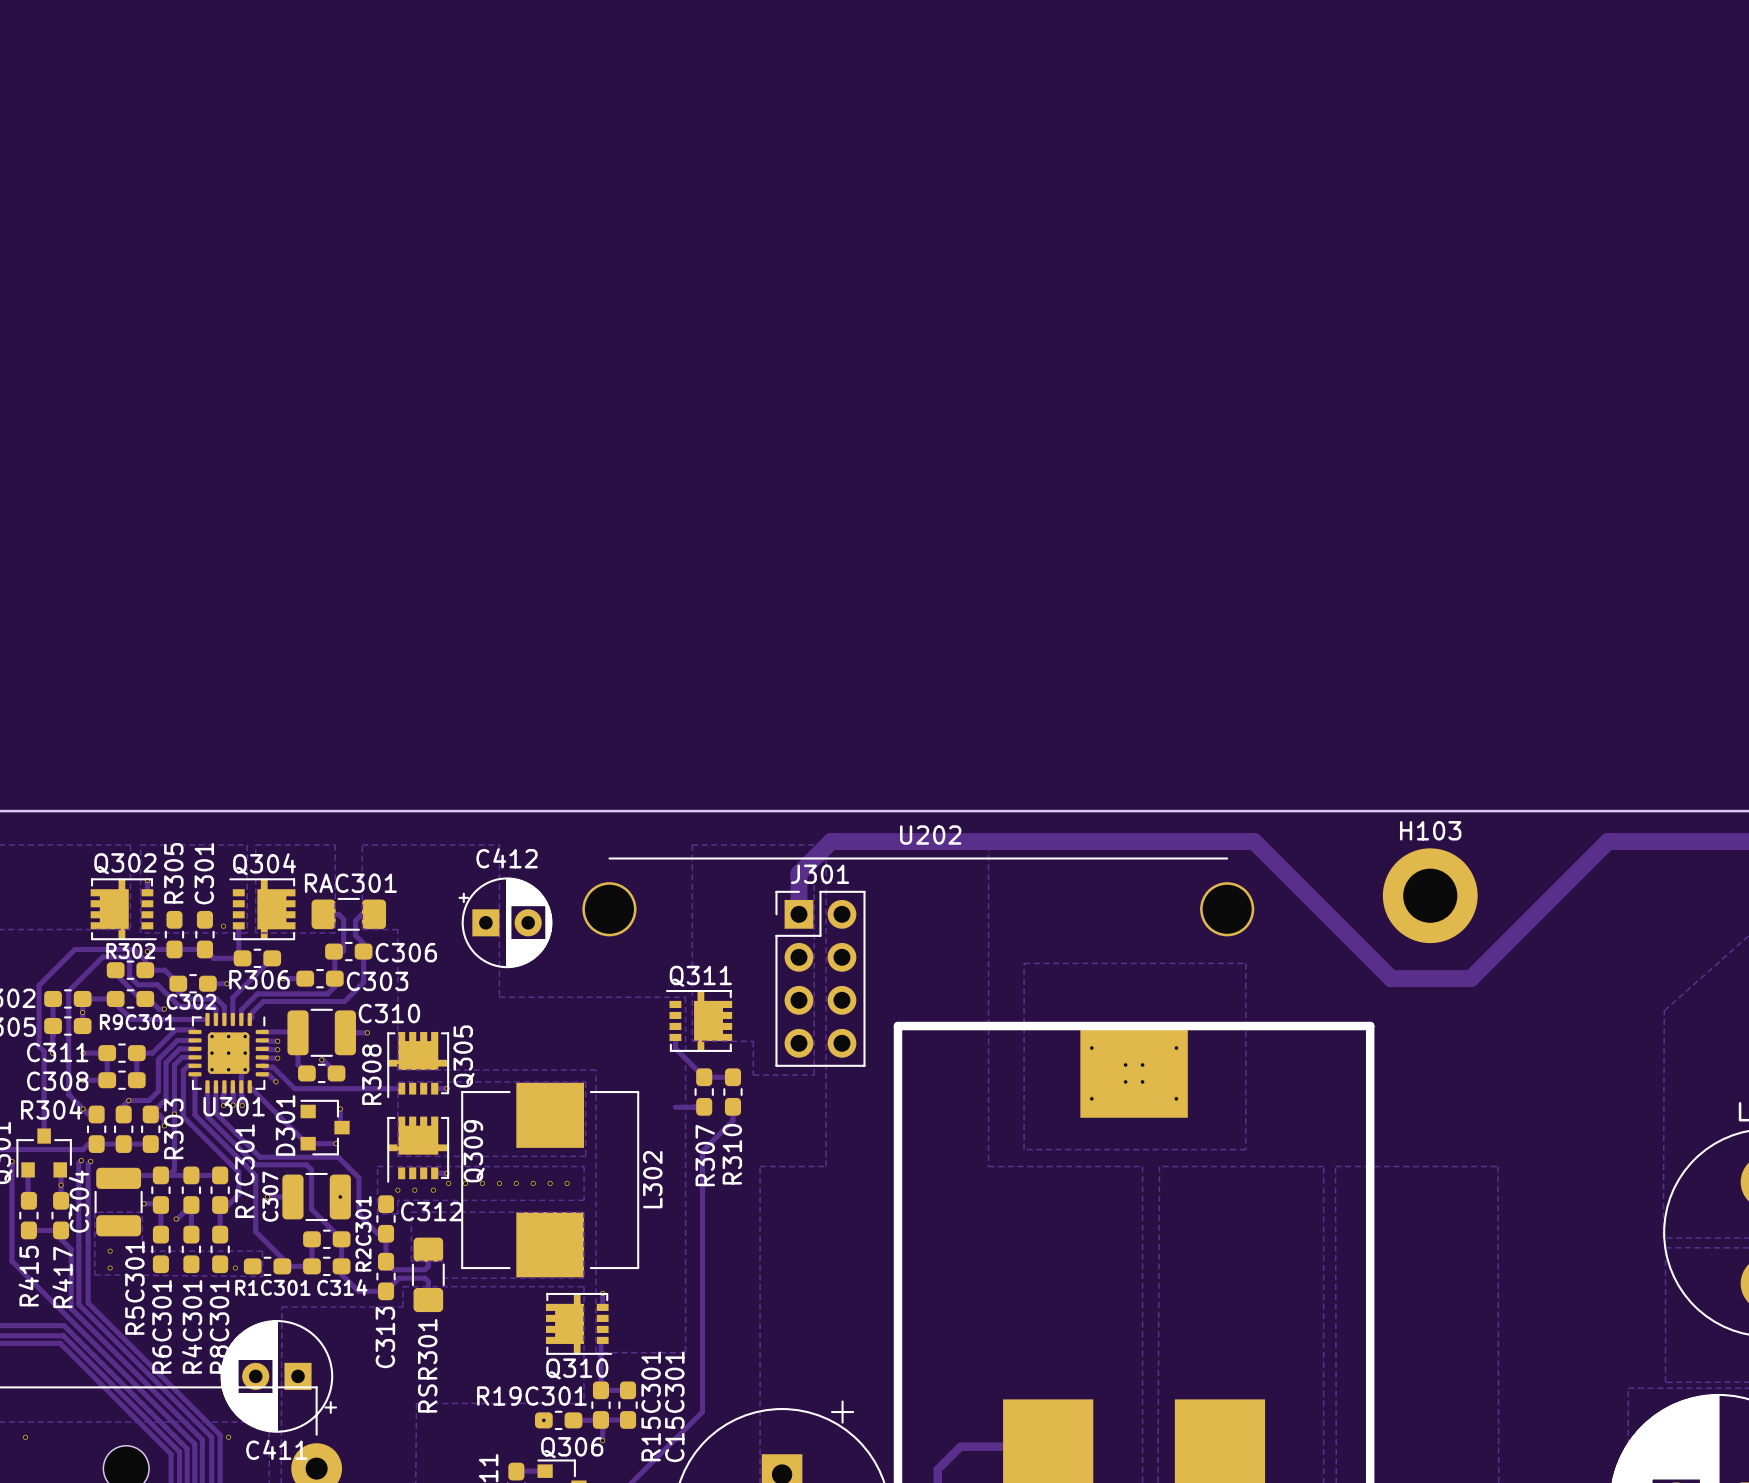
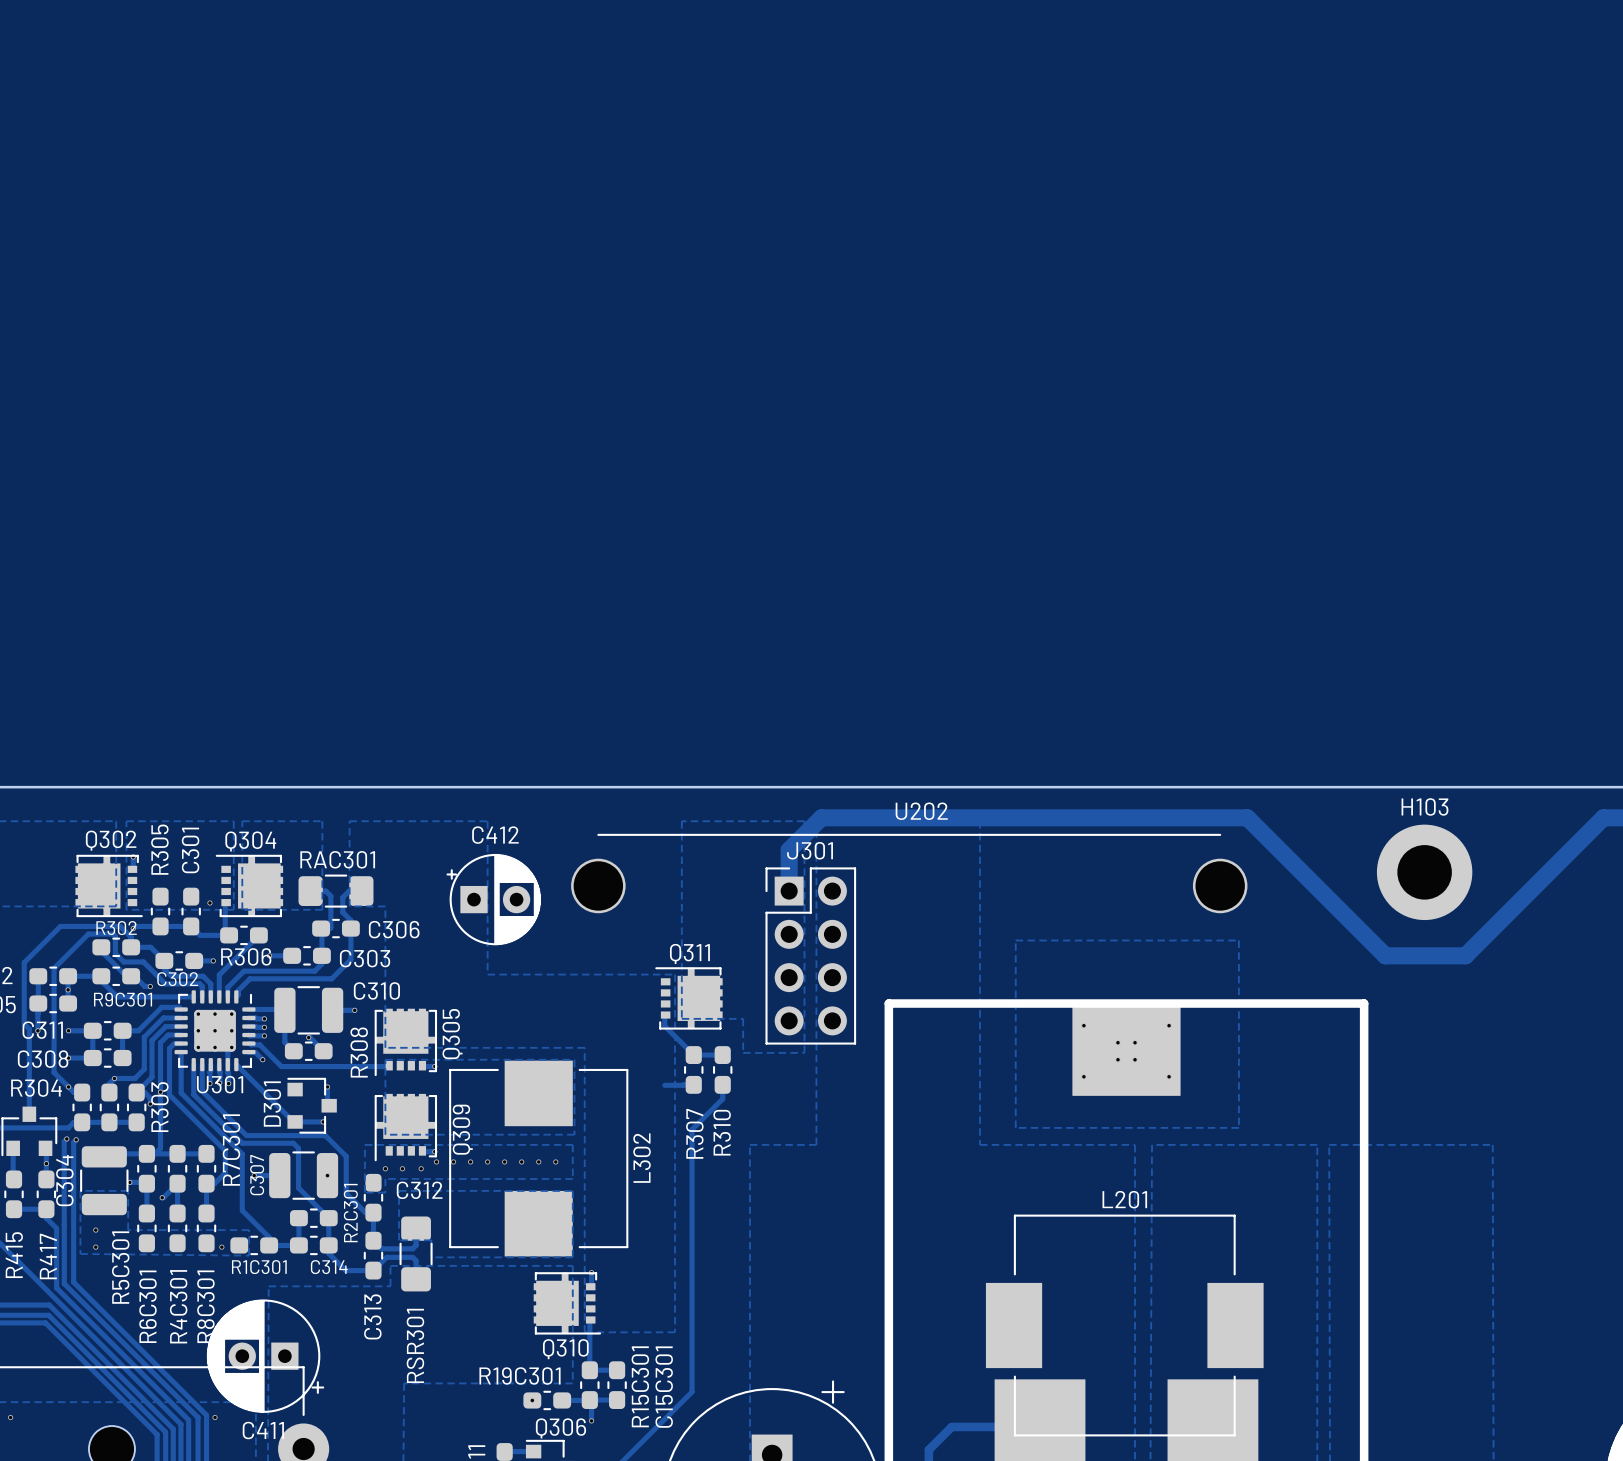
Q302 footprint: [90, 878, 157, 941] -> [75, 854, 143, 918]
Q304 footprint: [229, 878, 296, 941] -> [215, 854, 284, 918]
Q311 footprint: [665, 989, 733, 1052] -> [655, 967, 723, 1030]
Q305 footprint: [387, 1031, 450, 1099] -> [374, 1008, 438, 1077]
Q309 footprint: [387, 1116, 450, 1183] -> [374, 1093, 438, 1162]
Q310 footprint: [545, 1292, 613, 1355] -> [533, 1272, 602, 1335]
L201: none -> (1124, 1325)

